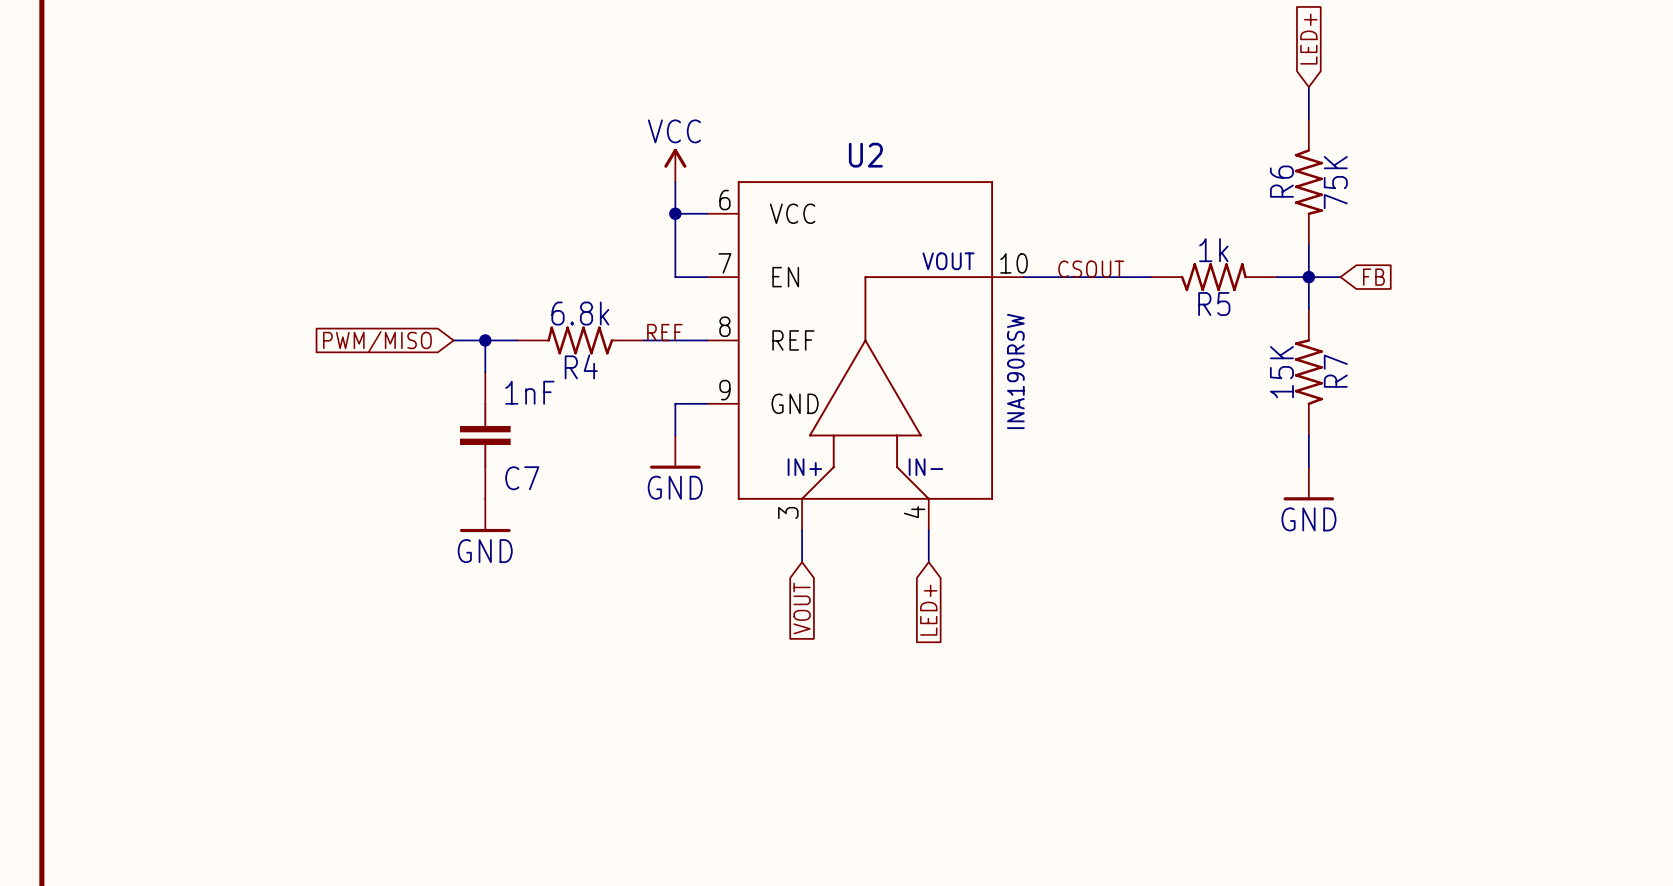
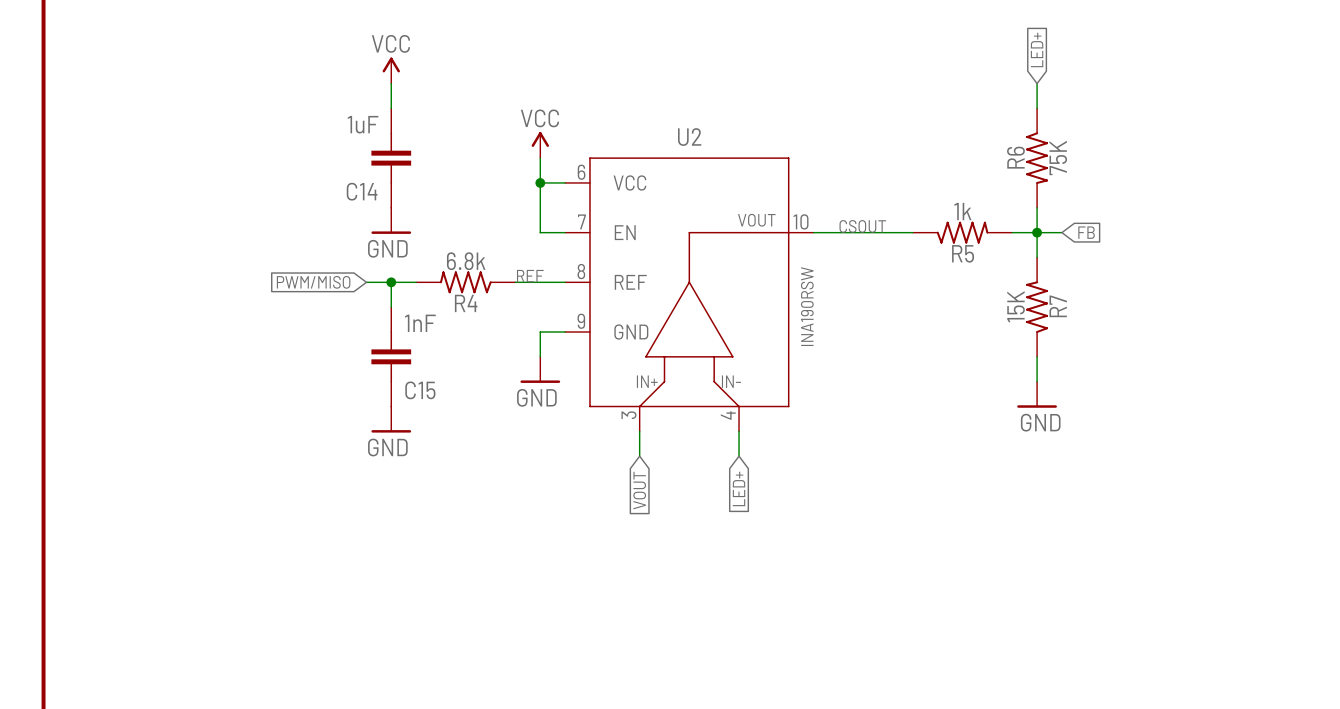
power symbol: none -> VCC (391, 70)
wire: none -> (391, 83) (391, 108)
C14: none -> 1uF (391, 158)
power symbol: none -> GND (391, 220)
C7 name: C7 (522, 478) -> C15 (420, 390)

